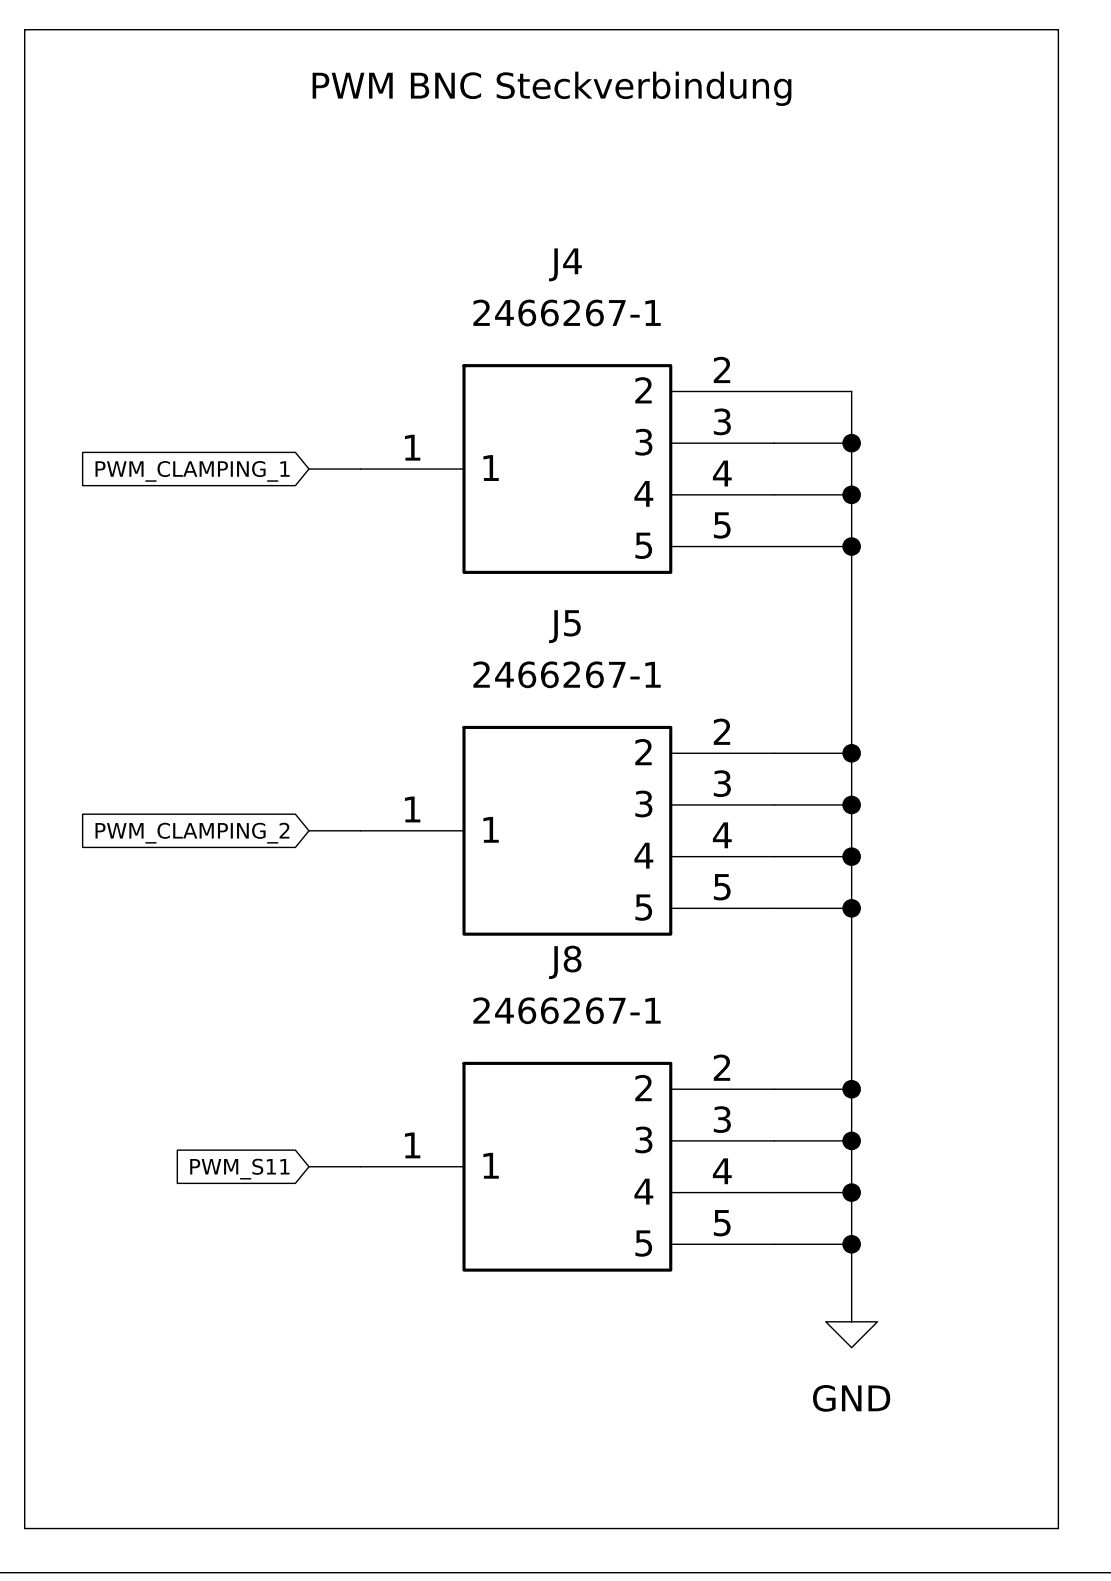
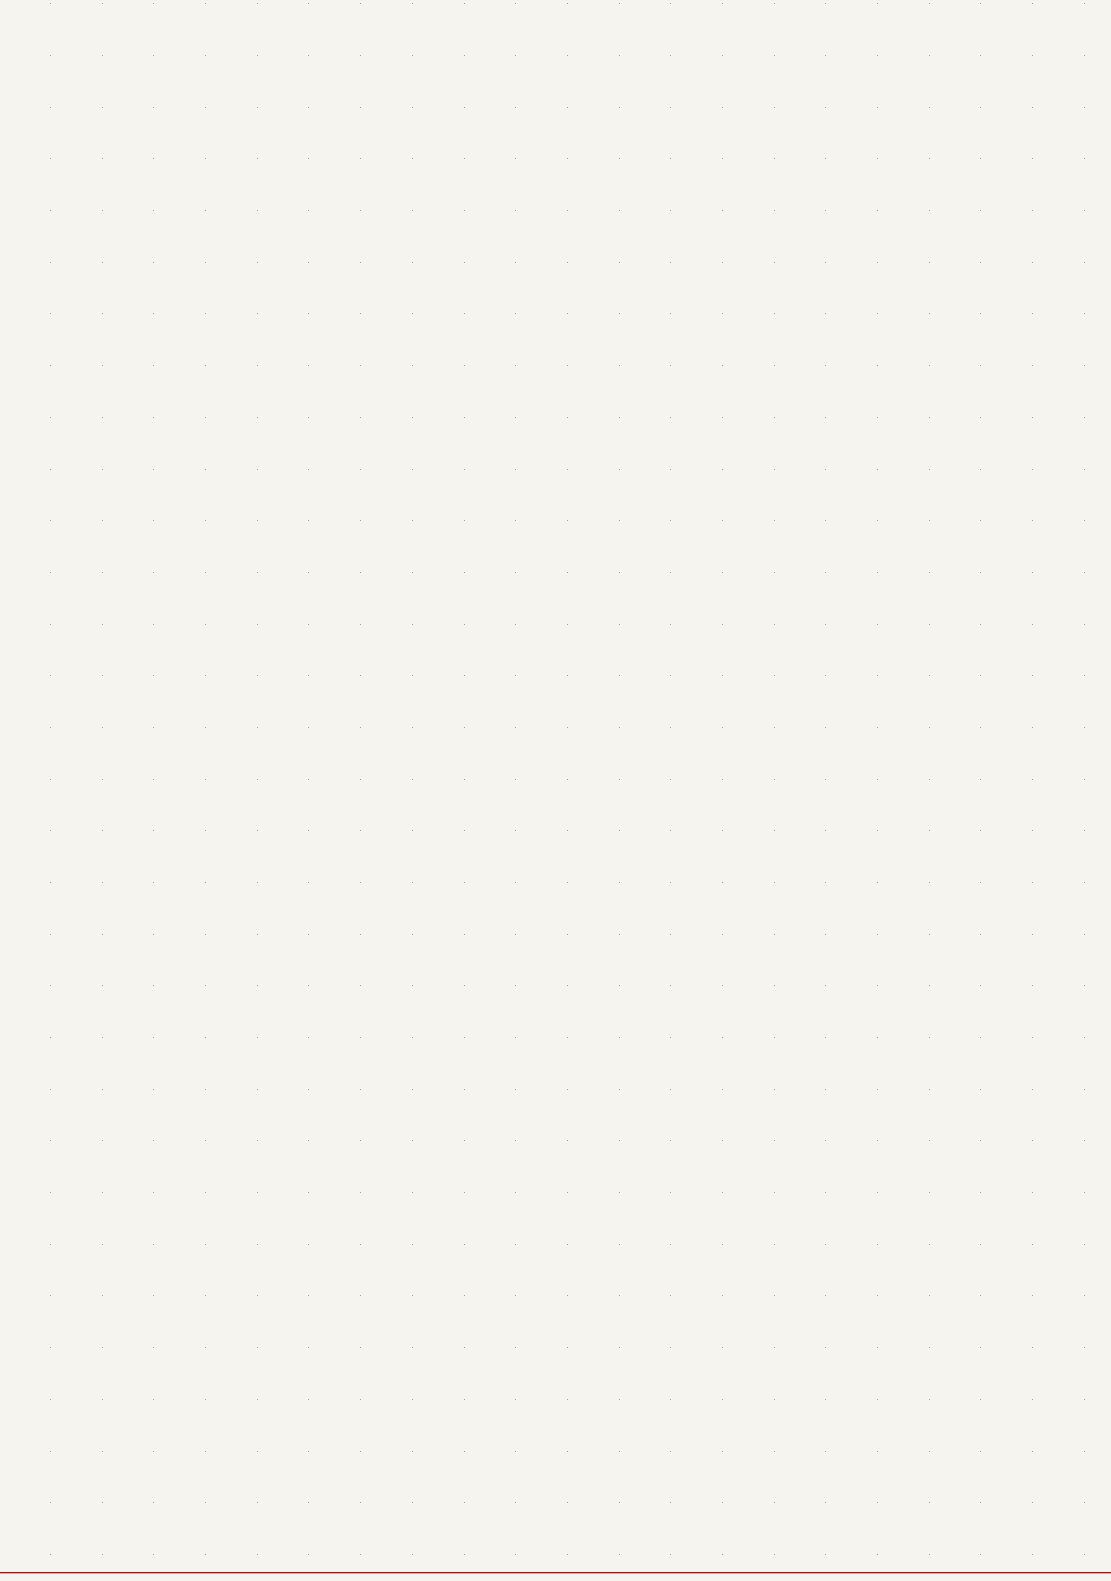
line: (24, 29) (1058, 29) (1058, 1528) (24, 1528) (24, 29) -> none
text: PWM BNC Steckverbindung (552, 88) -> none
wire: (774, 391) (851, 391) (851, 1295) -> none
wire: (774, 443) (851, 443) -> none
junction: (851, 443) -> none
wire: (308, 469) (360, 469) -> none
J4: 2466267-1 (567, 469) -> none
global label: PWM_CLAMPING_1 (192, 471) -> none
wire: (774, 494) (851, 494) -> none
junction: (851, 494) -> none
wire: (774, 546) (851, 546) -> none
junction: (851, 546) -> none
wire: (774, 753) (851, 753) -> none
junction: (851, 753) -> none
wire: (774, 804) (851, 804) -> none
junction: (851, 804) -> none
wire: (308, 830) (360, 830) -> none
J5: 2466267-1 (567, 830) -> none
global label: PWM_CLAMPING_2 (192, 833) -> none
wire: (774, 856) (851, 856) -> none
junction: (851, 856) -> none
wire: (774, 908) (851, 908) -> none
junction: (851, 908) -> none
wire: (774, 1089) (851, 1089) -> none
junction: (851, 1089) -> none
wire: (774, 1140) (851, 1140) -> none
junction: (851, 1140) -> none
wire: (308, 1166) (360, 1166) -> none
J8: 2466267-1 (567, 1166) -> none
global label: PWM_S11 (239, 1169) -> none
wire: (774, 1192) (851, 1192) -> none
junction: (851, 1192) -> none
wire: (774, 1244) (851, 1244) -> none
junction: (851, 1244) -> none
power symbol: GND (851, 1321) -> none

